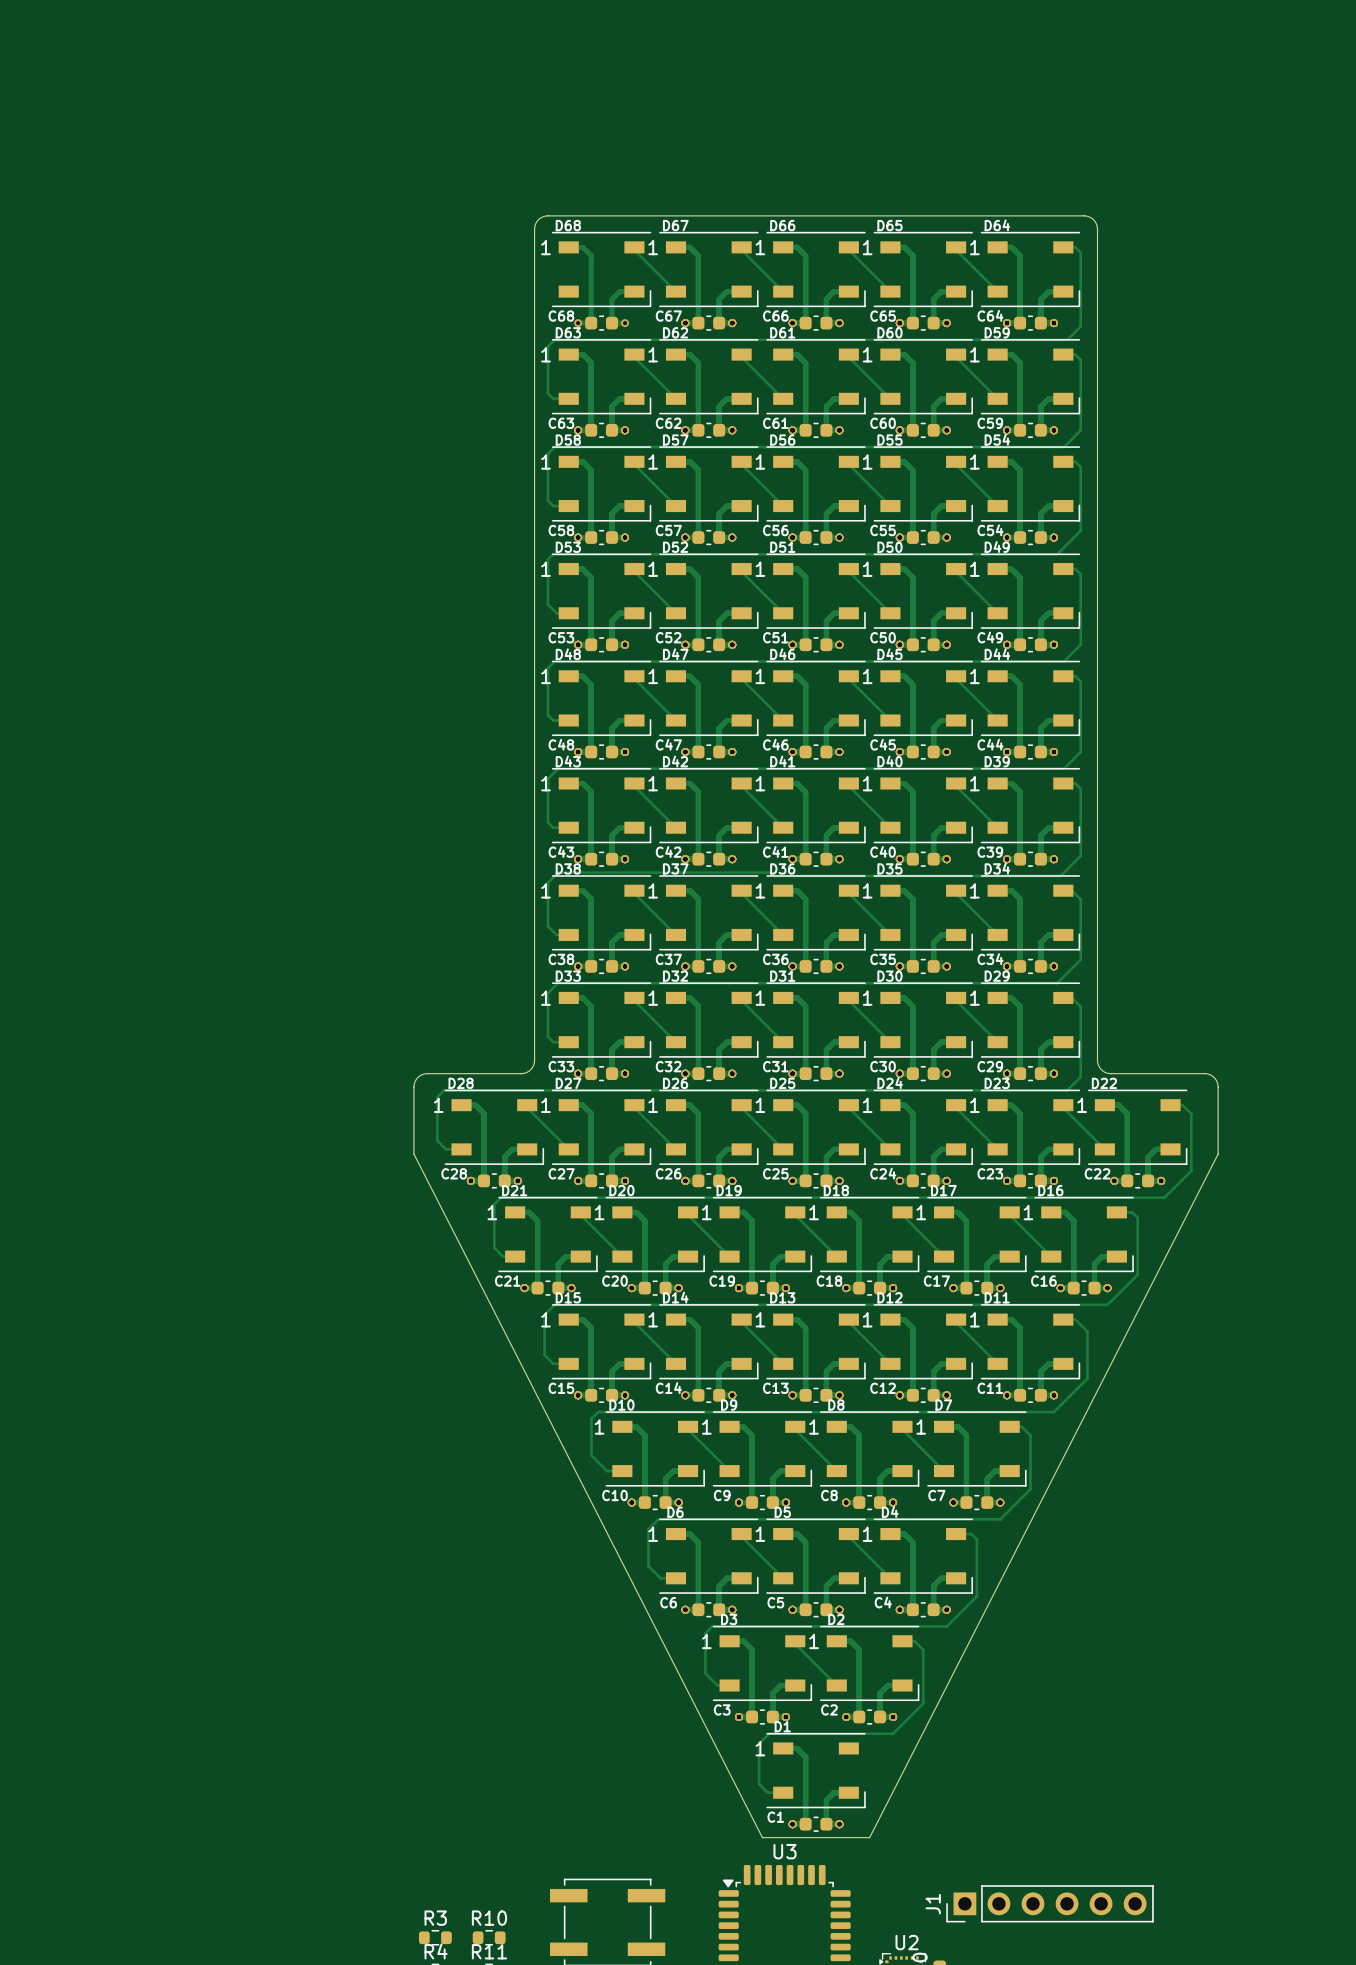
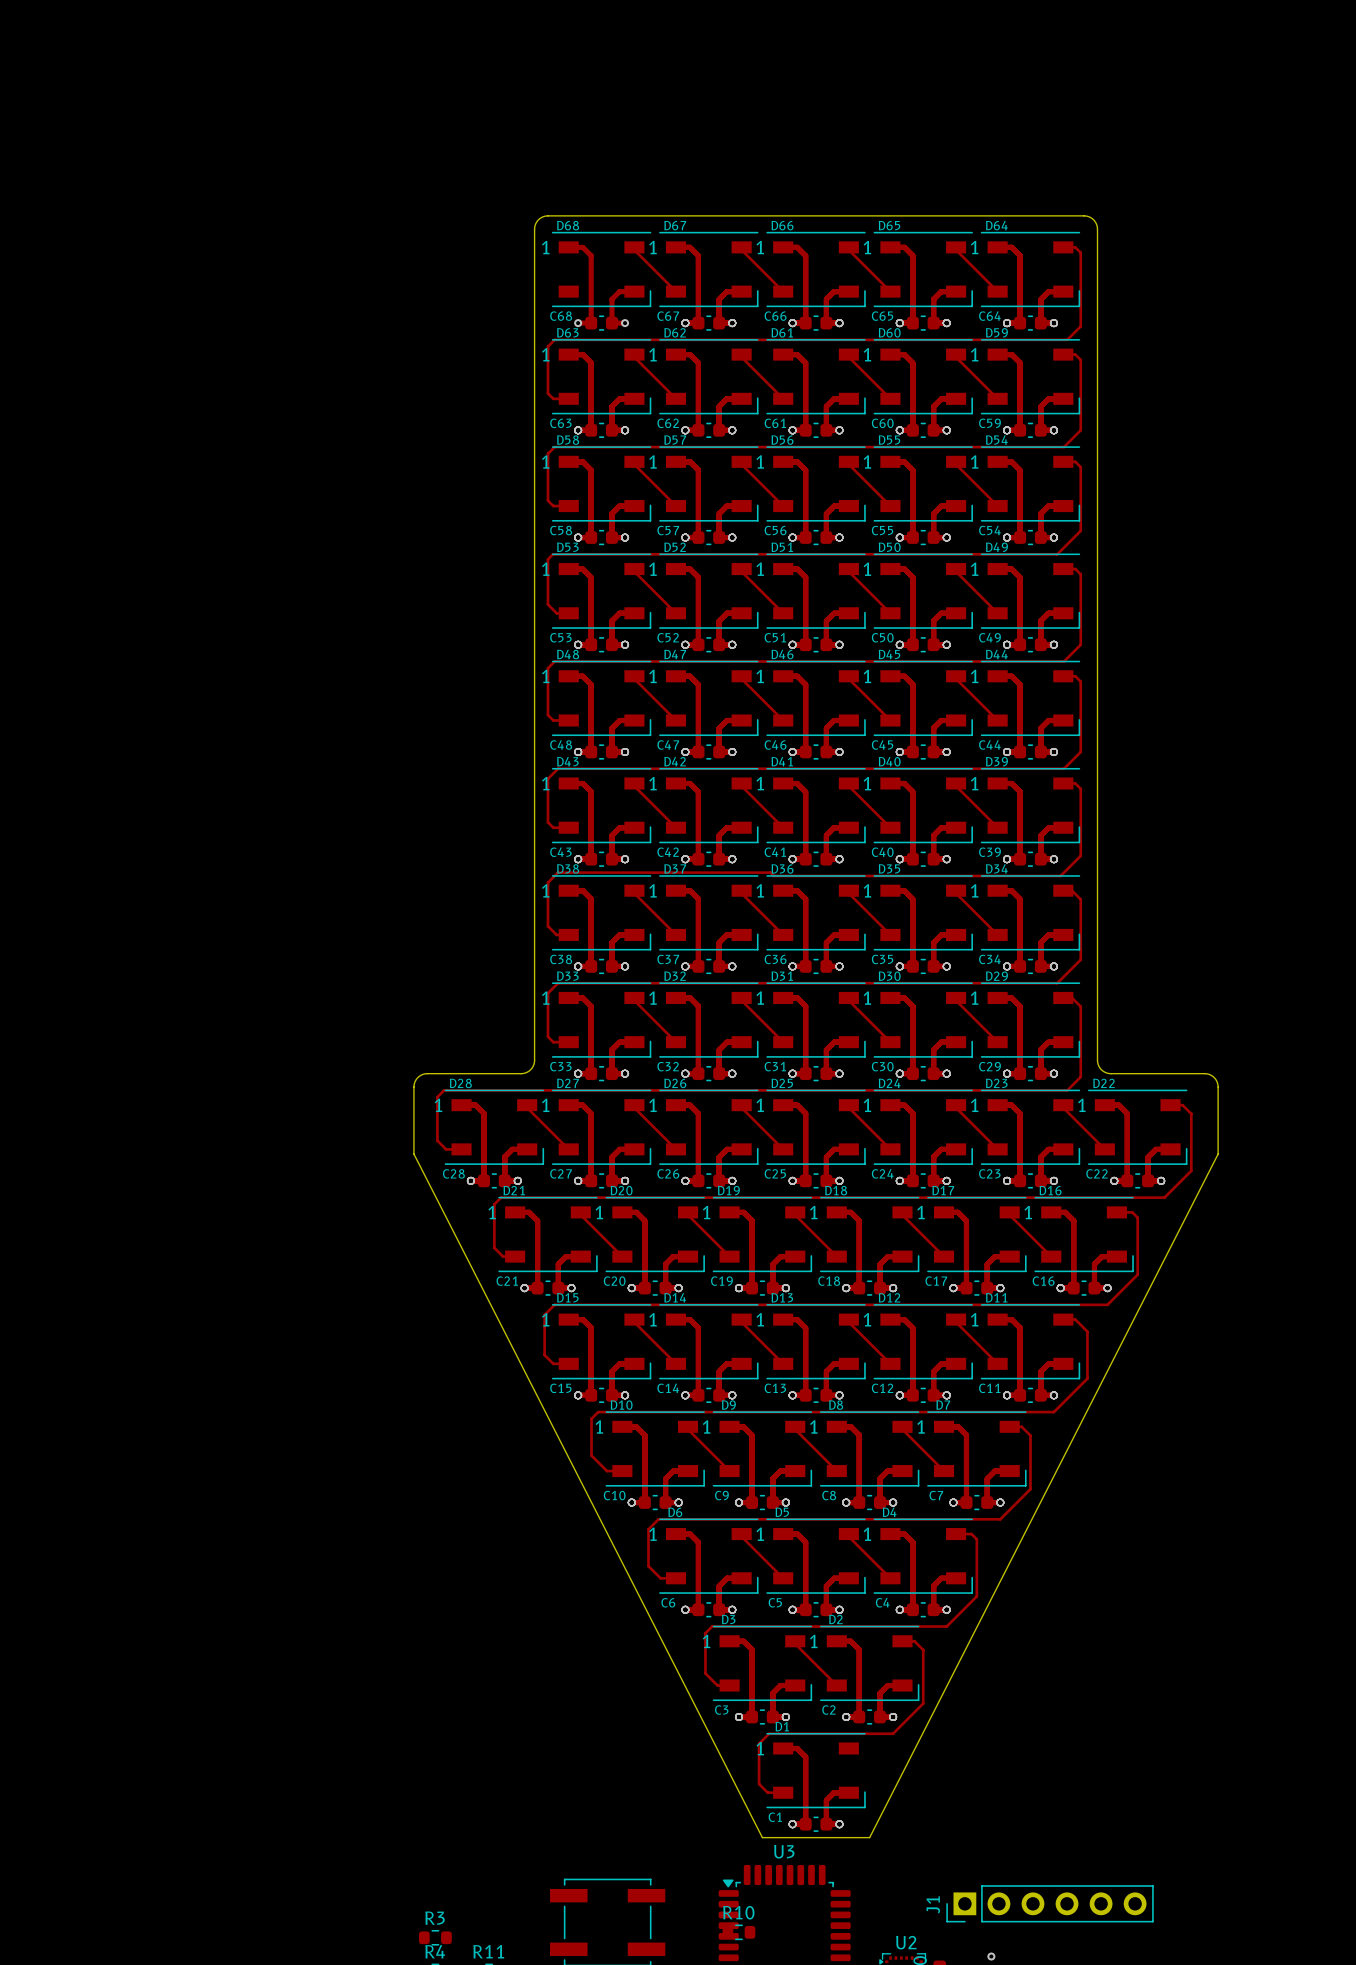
R10 position: (489, 1937) -> (738, 1932)
via: none -> (991, 1956)

